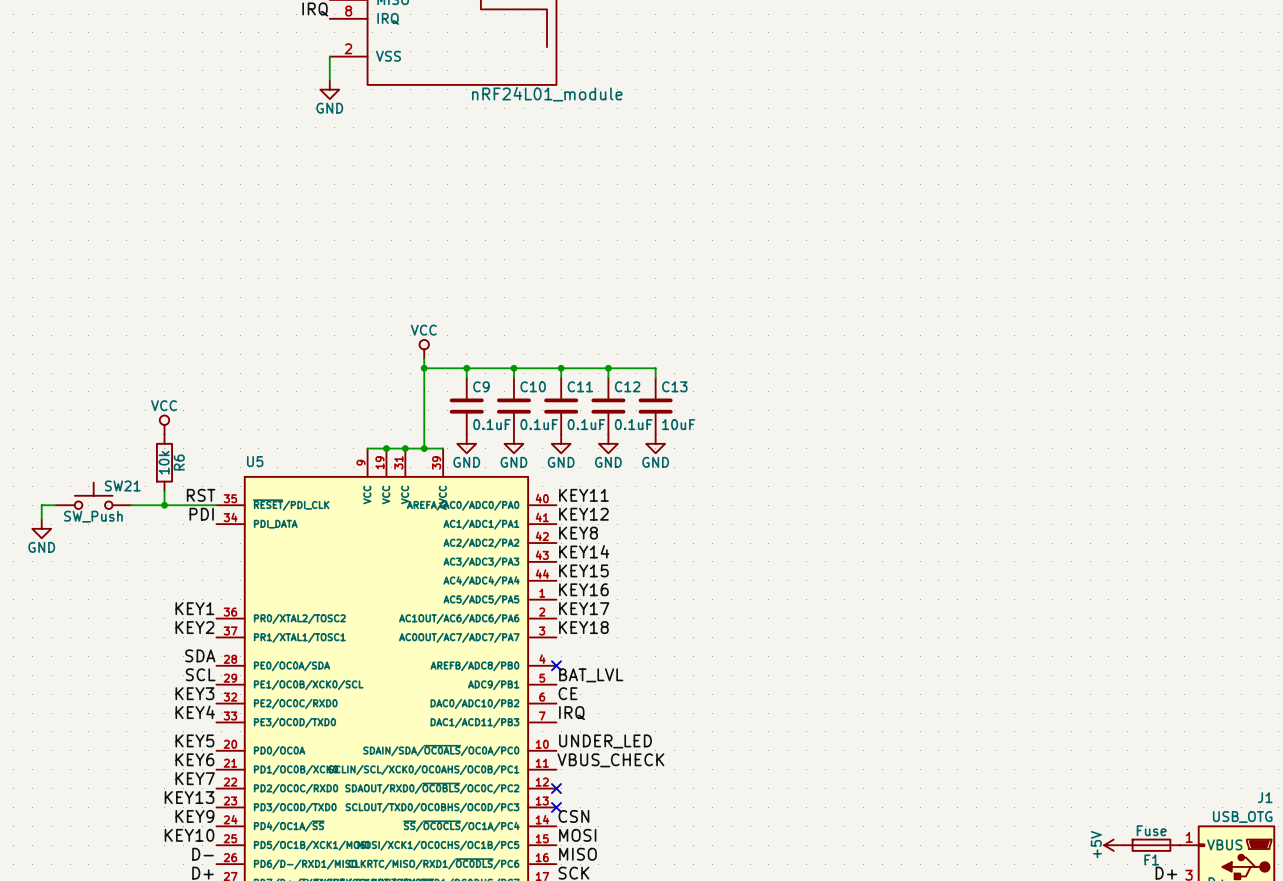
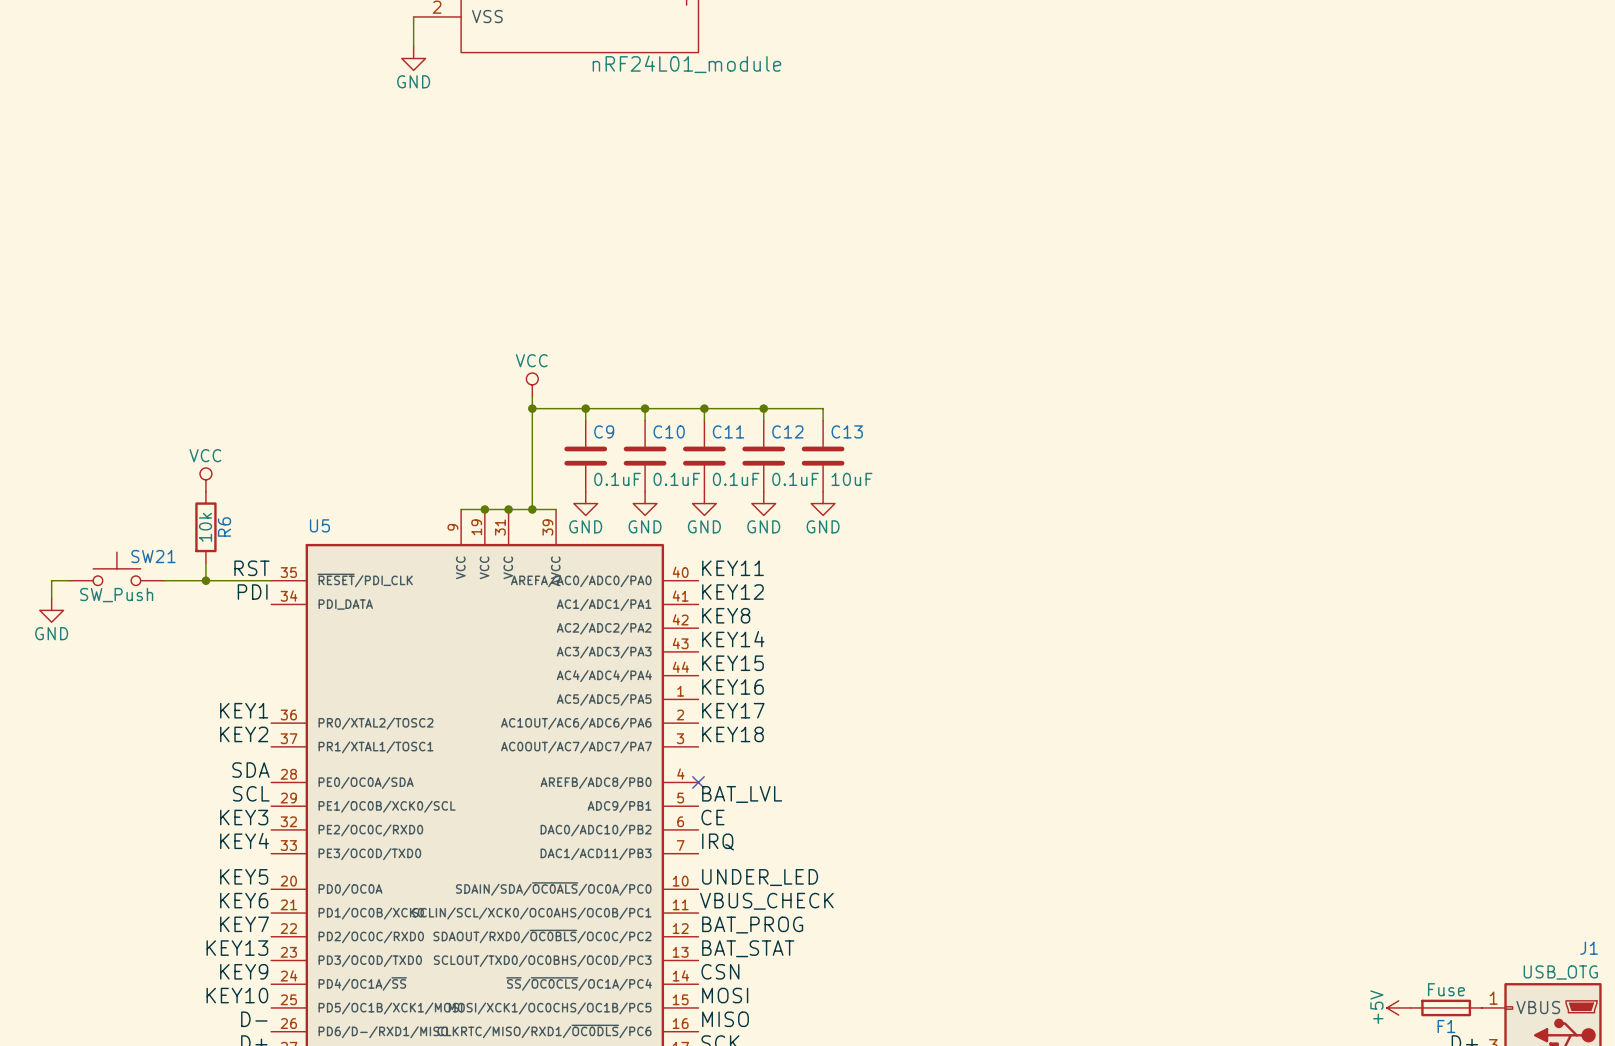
label: none -> BAT_PROG (752, 925)
no-connect mark: (556, 788) -> none
label: none -> BAT_STAT (748, 948)
no-connect mark: (556, 807) -> none

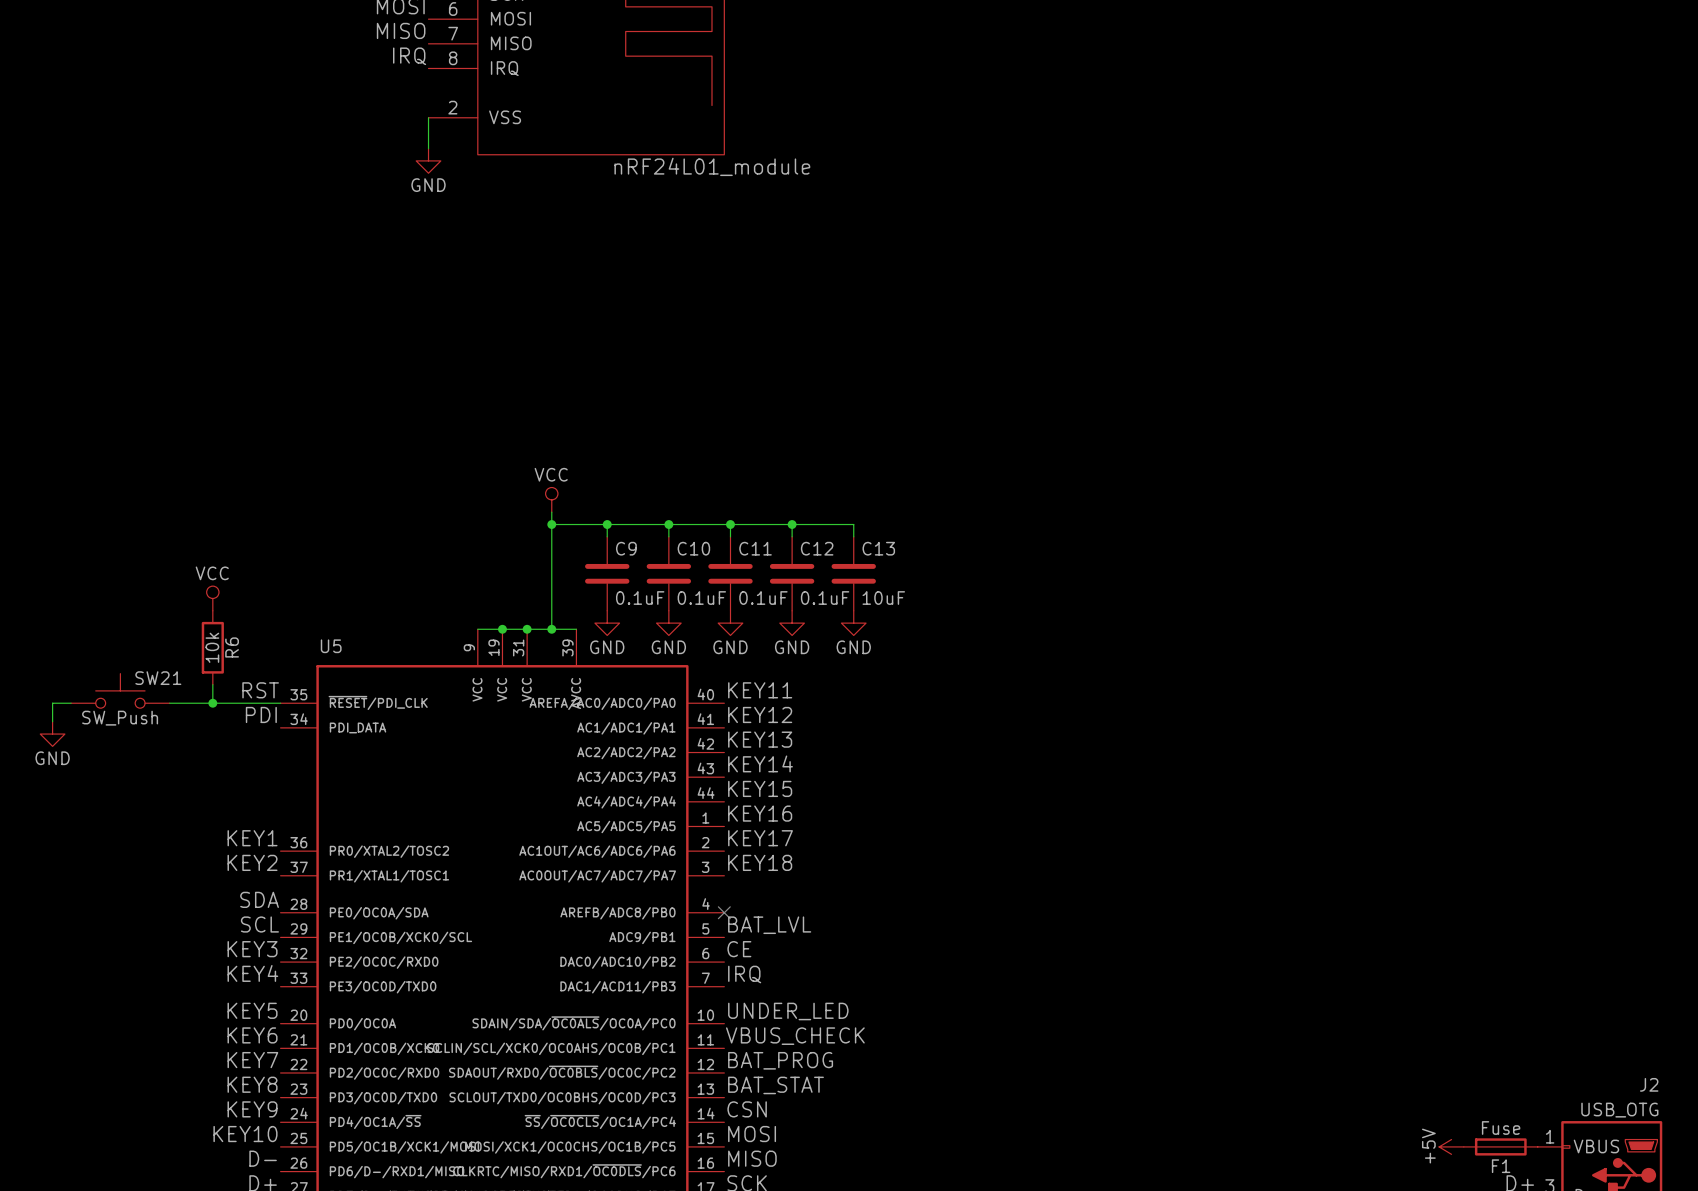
label: KEY8 (726, 615) -> KEY13 (760, 739)
label: KEY13 (237, 948) -> KEY8 (252, 1084)
J1 name: J1 (1589, 948) -> J2 (1649, 1084)

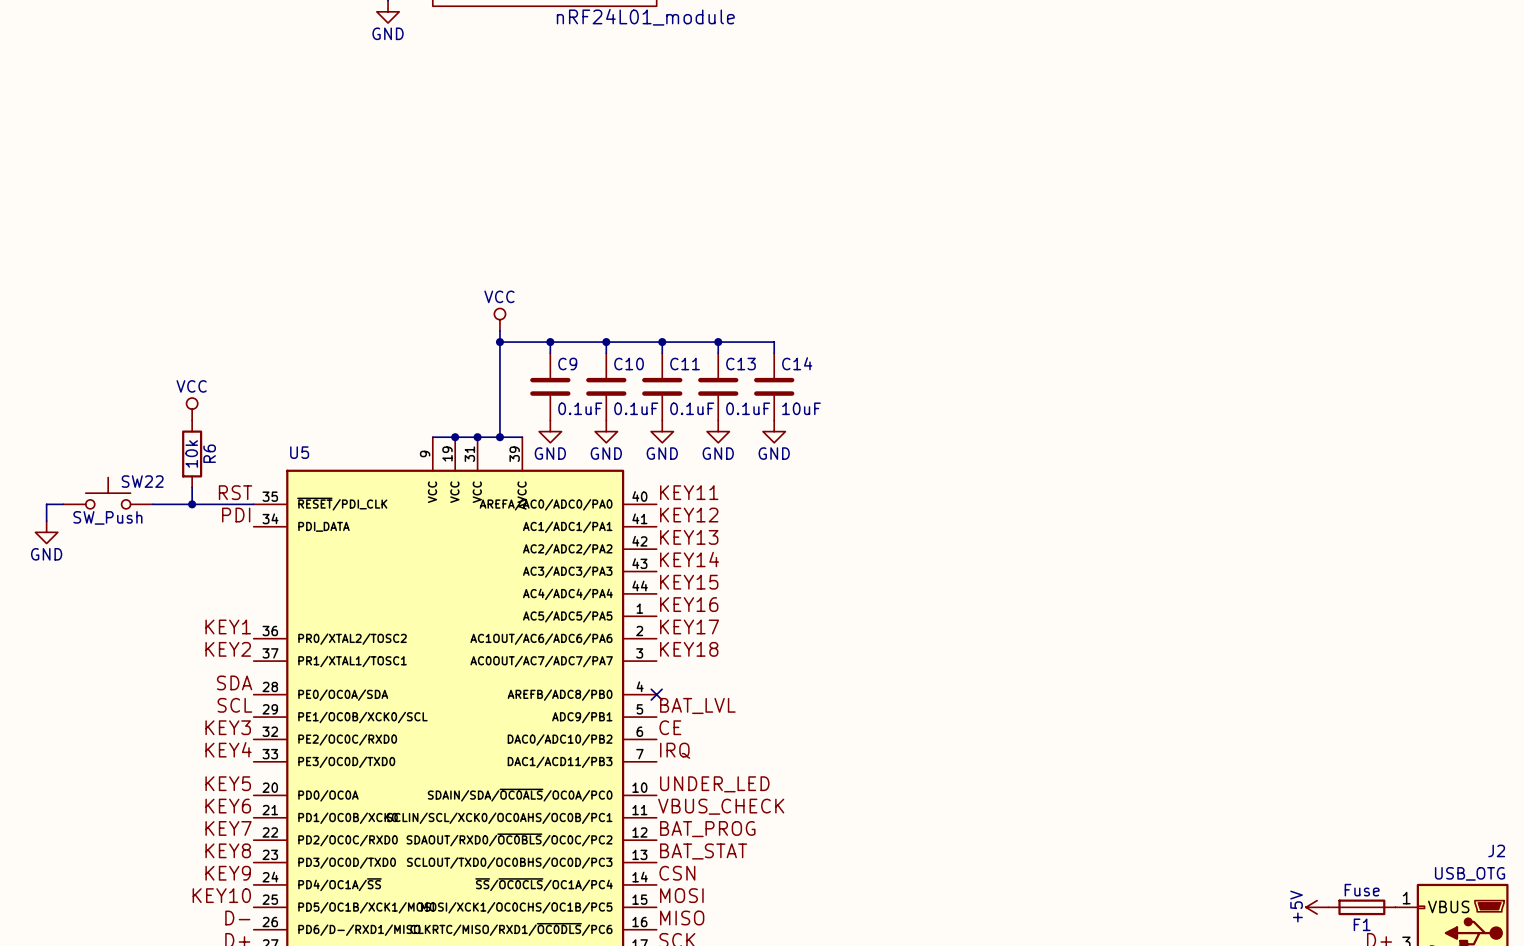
C12 name: C12 (817, 548) -> C13 (740, 364)
C13 name: C13 (878, 548) -> C14 (797, 363)
SW21 name: SW21 (158, 678) -> SW22 (142, 481)

